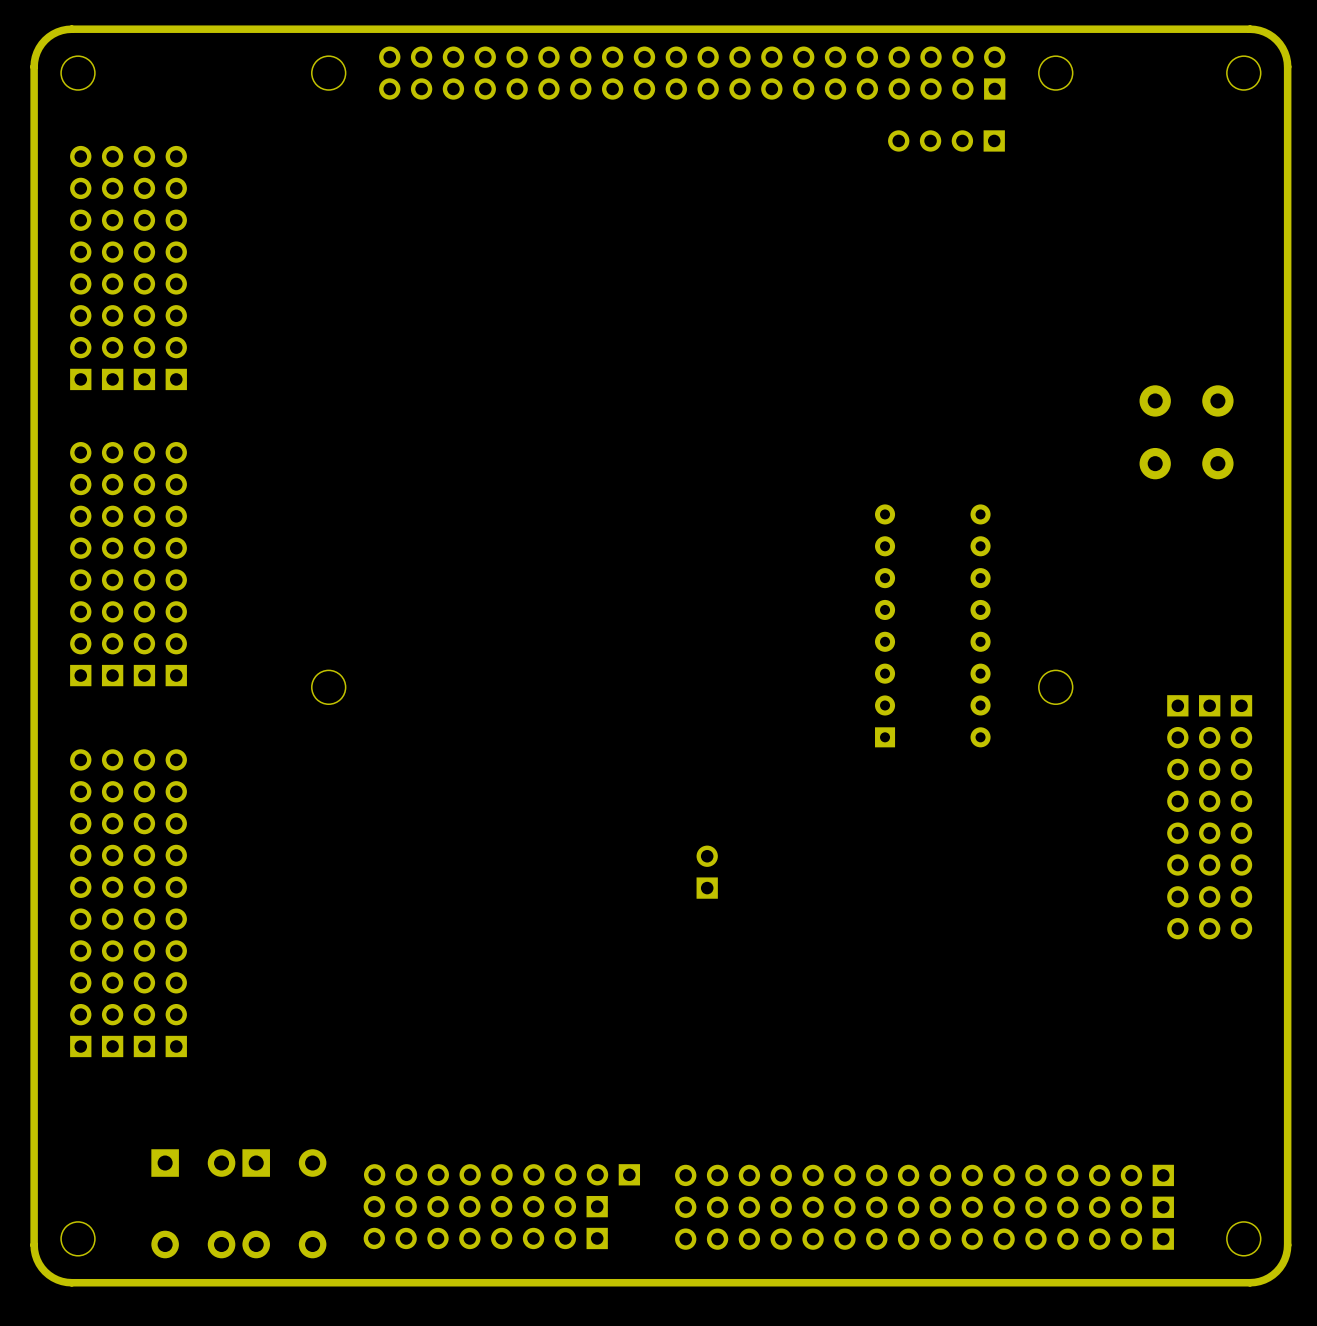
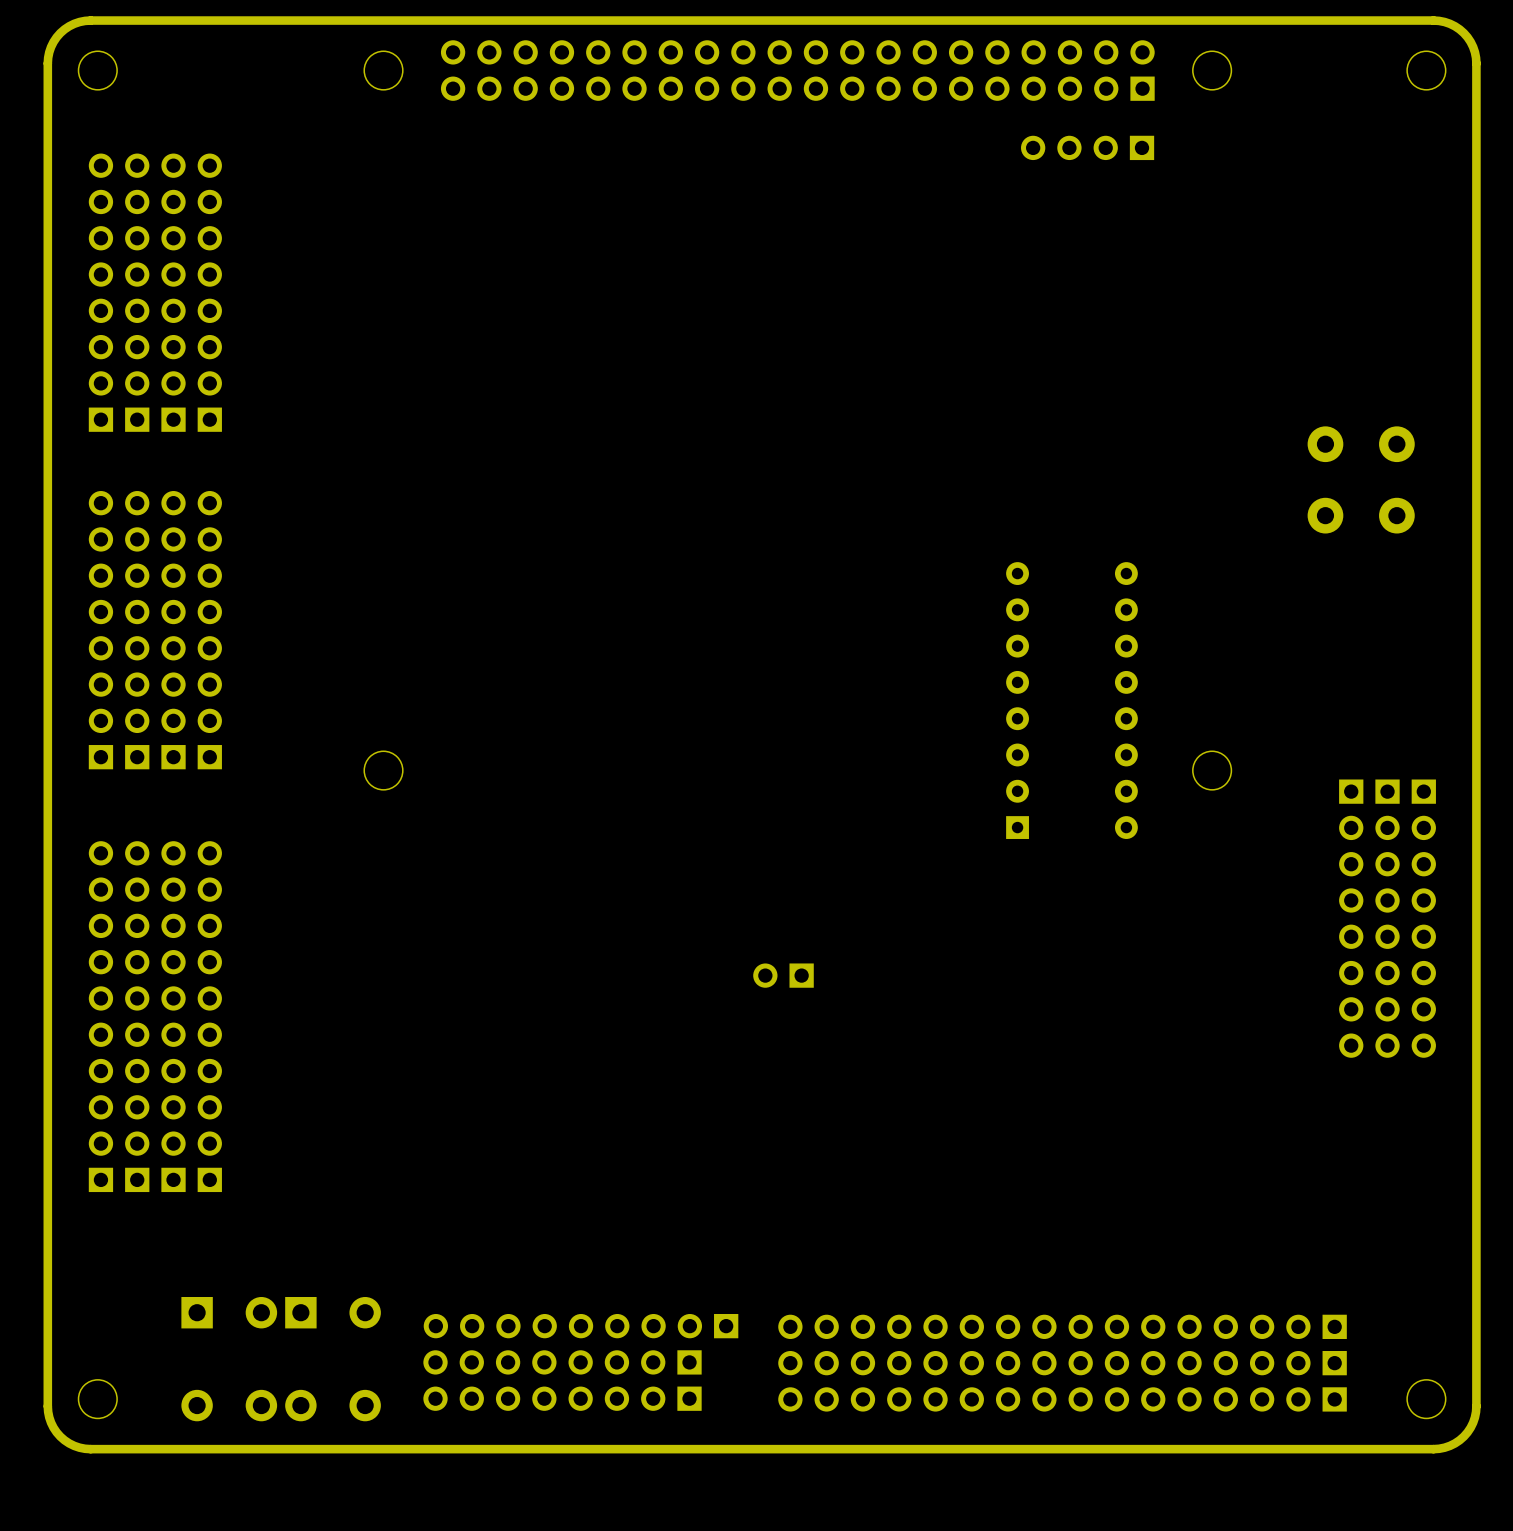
part rotation: 0° (707, 872) -> 90° counterclockwise (783, 975)

